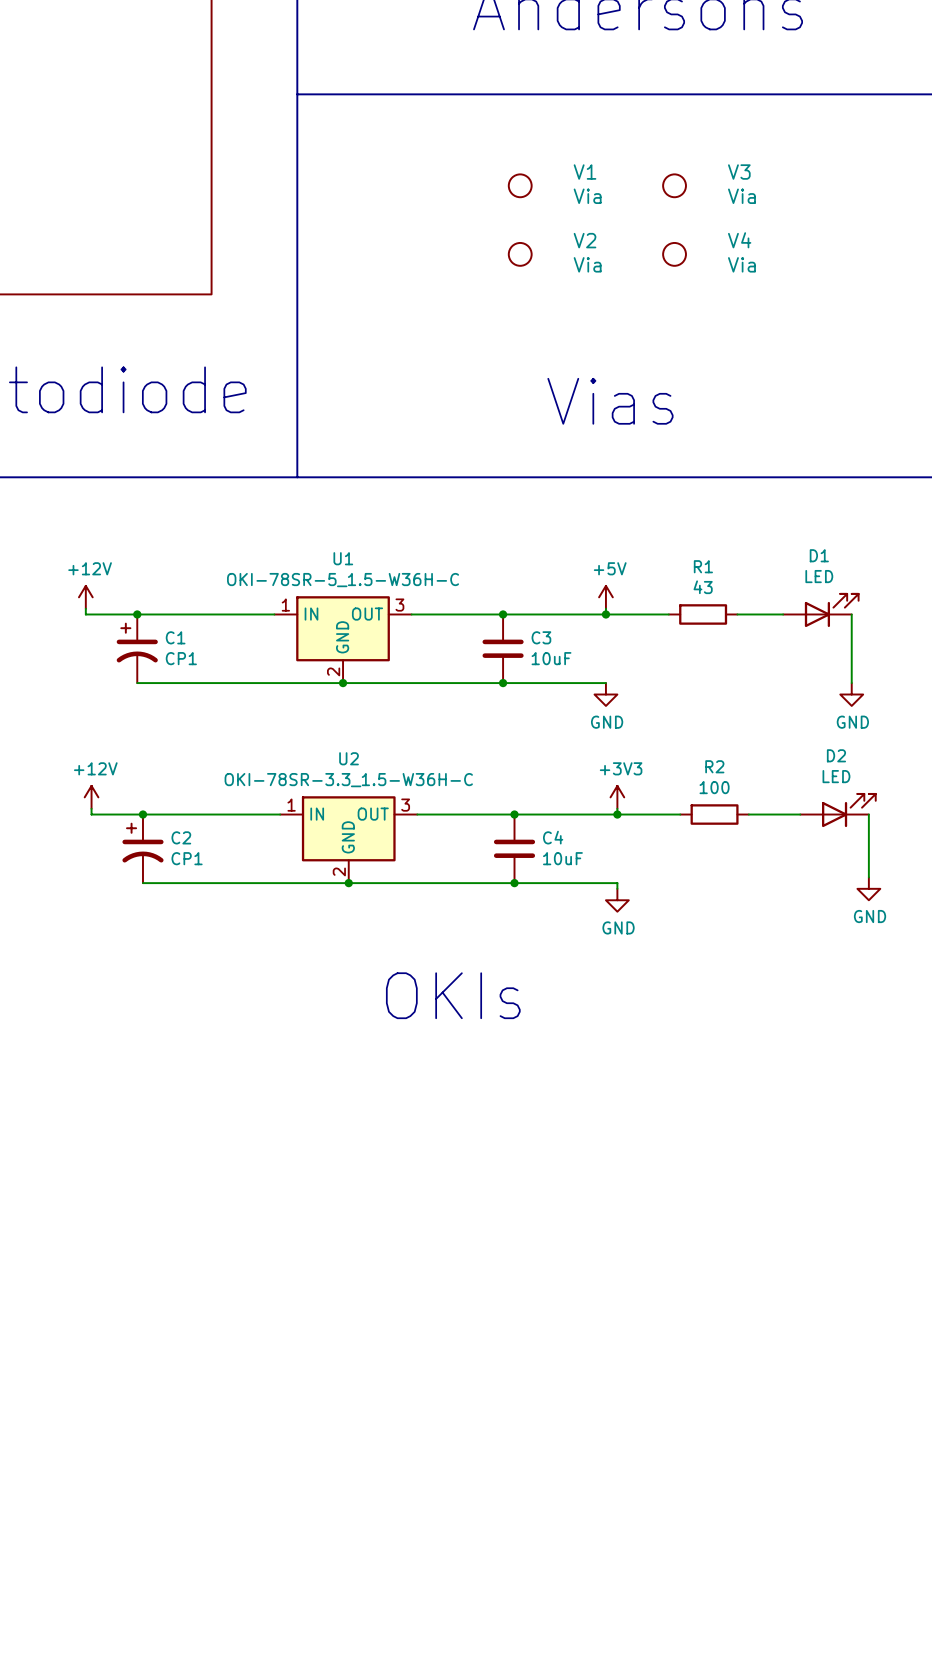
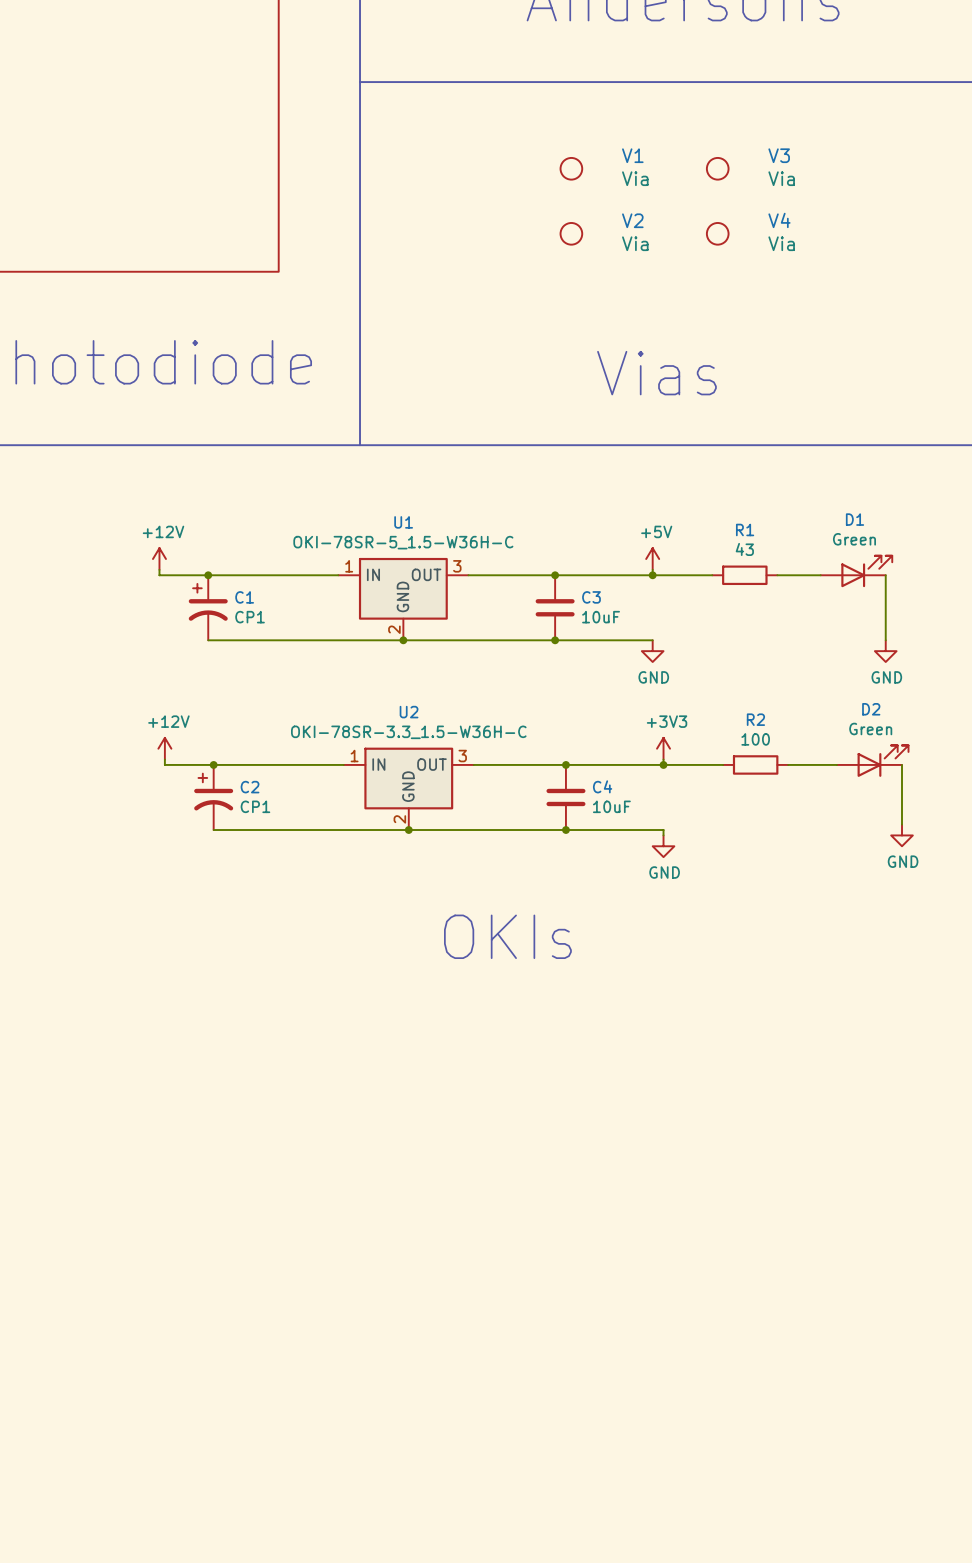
D1 value: LED (819, 576) -> Green (854, 539)
D2 value: LED (836, 776) -> Green (870, 729)

